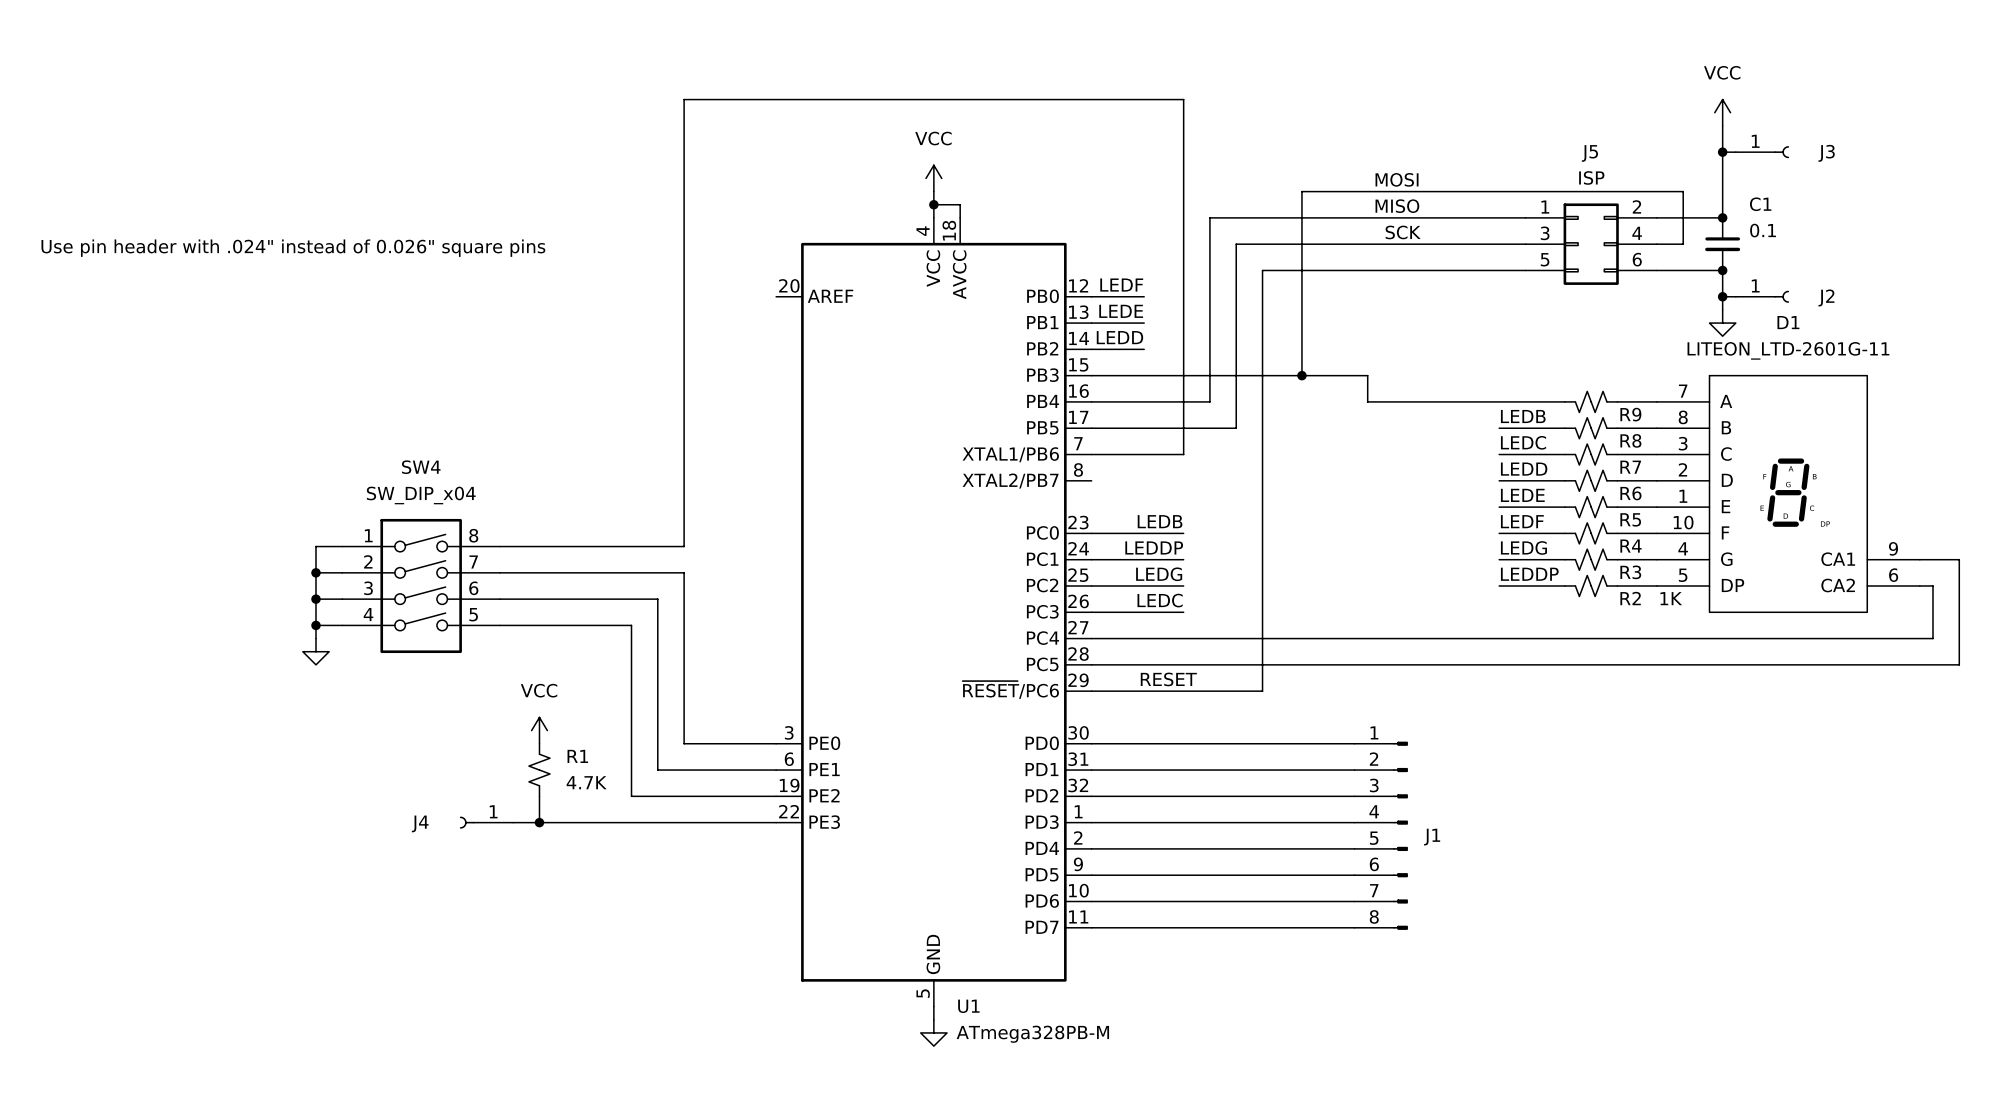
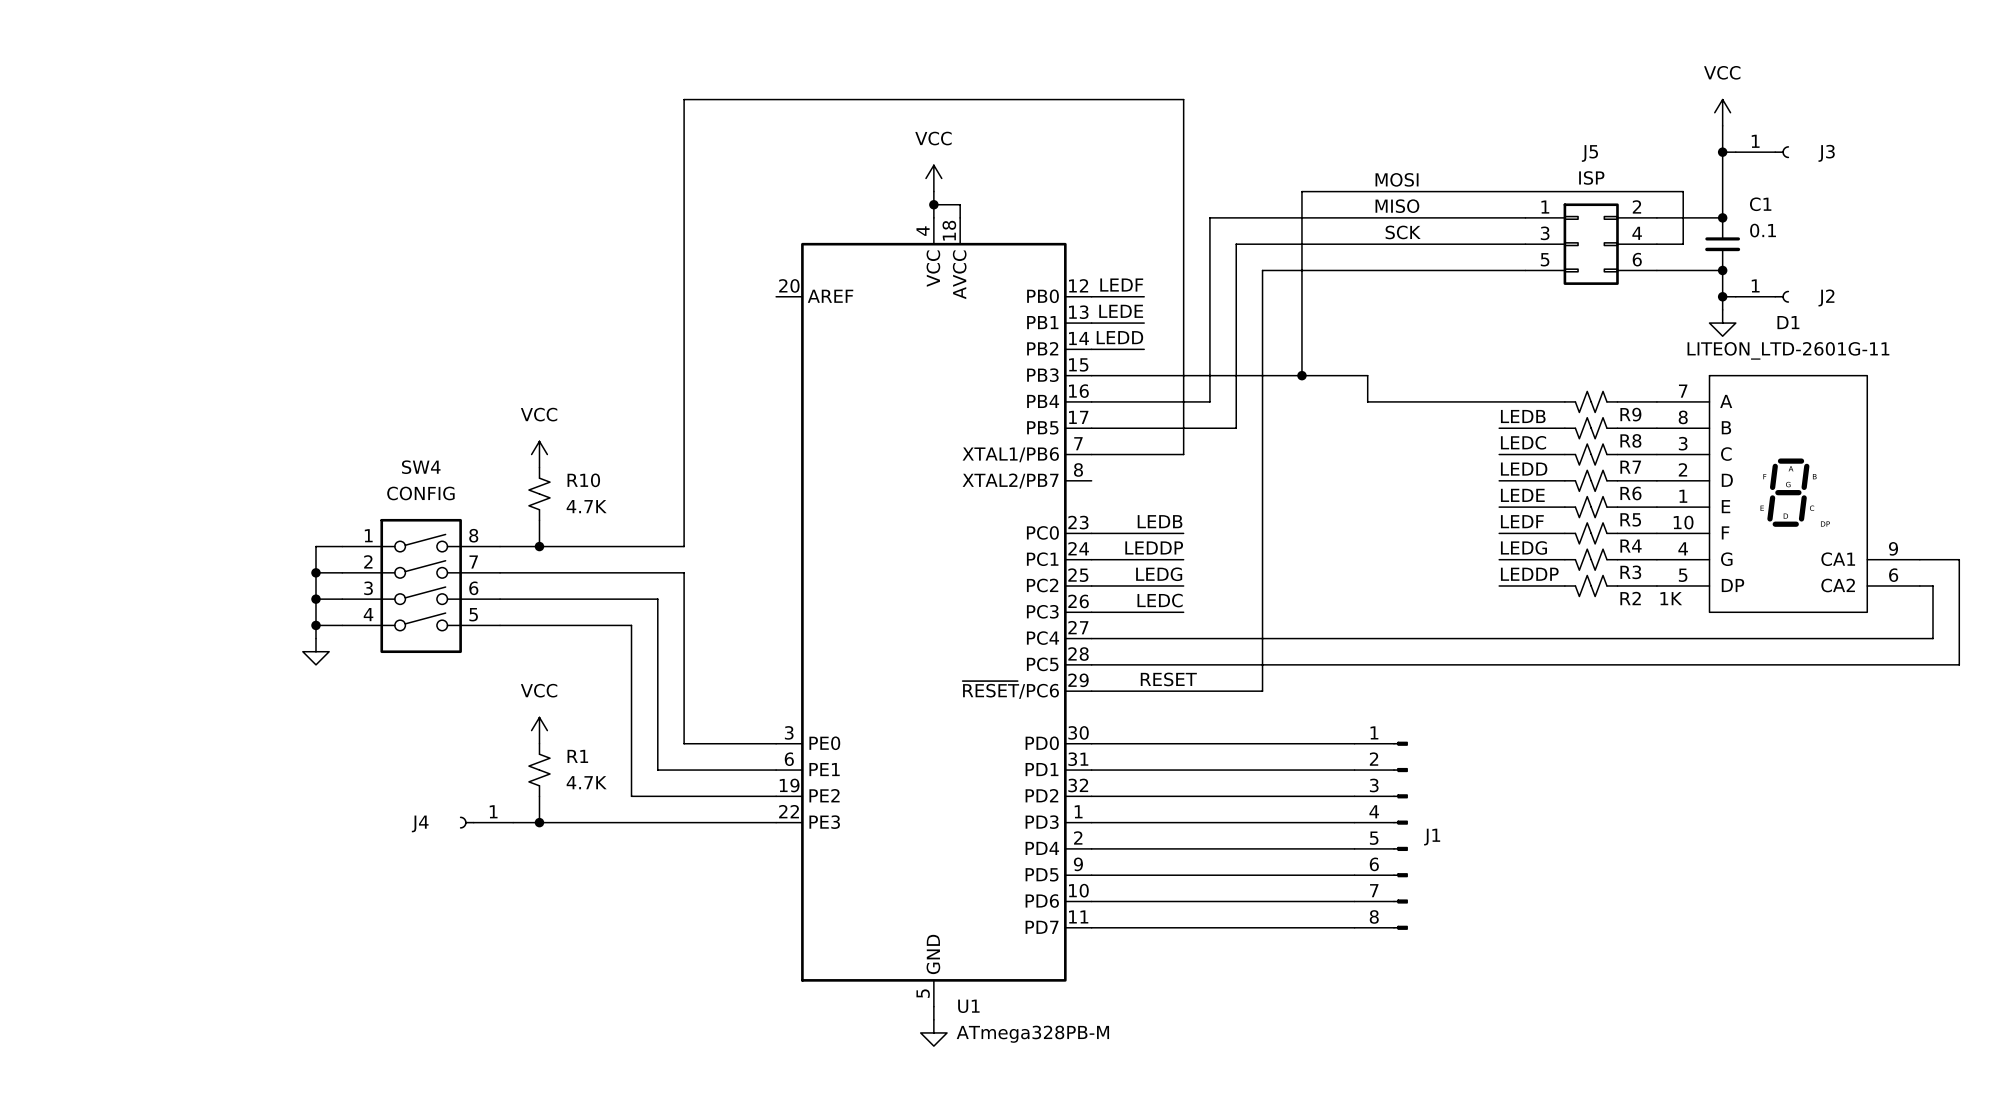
text: Use pin header with .024" instead of 0.026" square pins (293, 248) -> none
power symbol: none -> VCC (539, 454)
R10: none -> 4.7K (539, 493)
SW4 value: SW_DIP_x04 (421, 495) -> CONFIG (420, 493)
wire: none -> (539, 520) (539, 546)
junction: none -> (539, 546)

